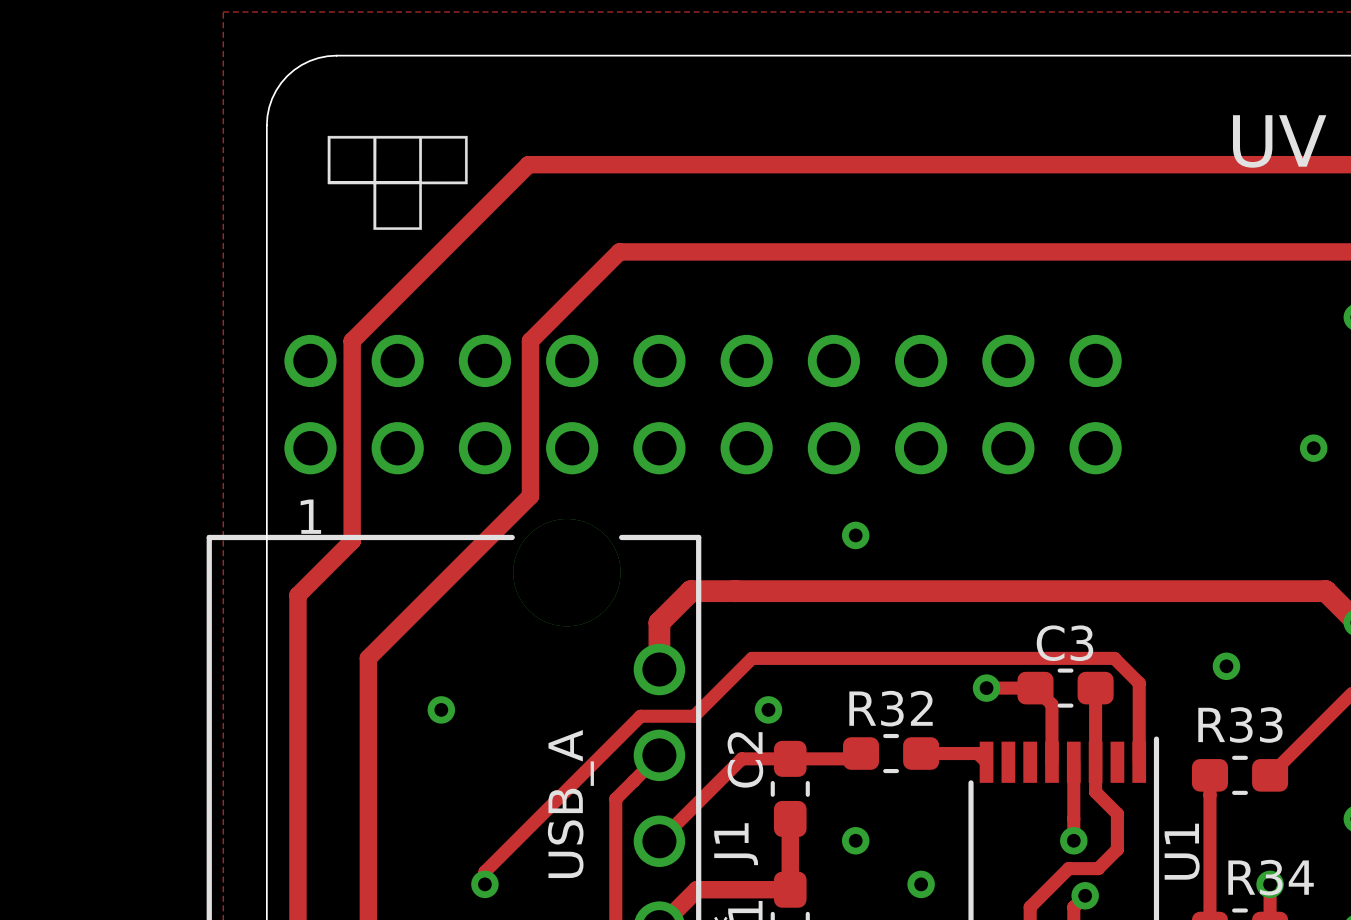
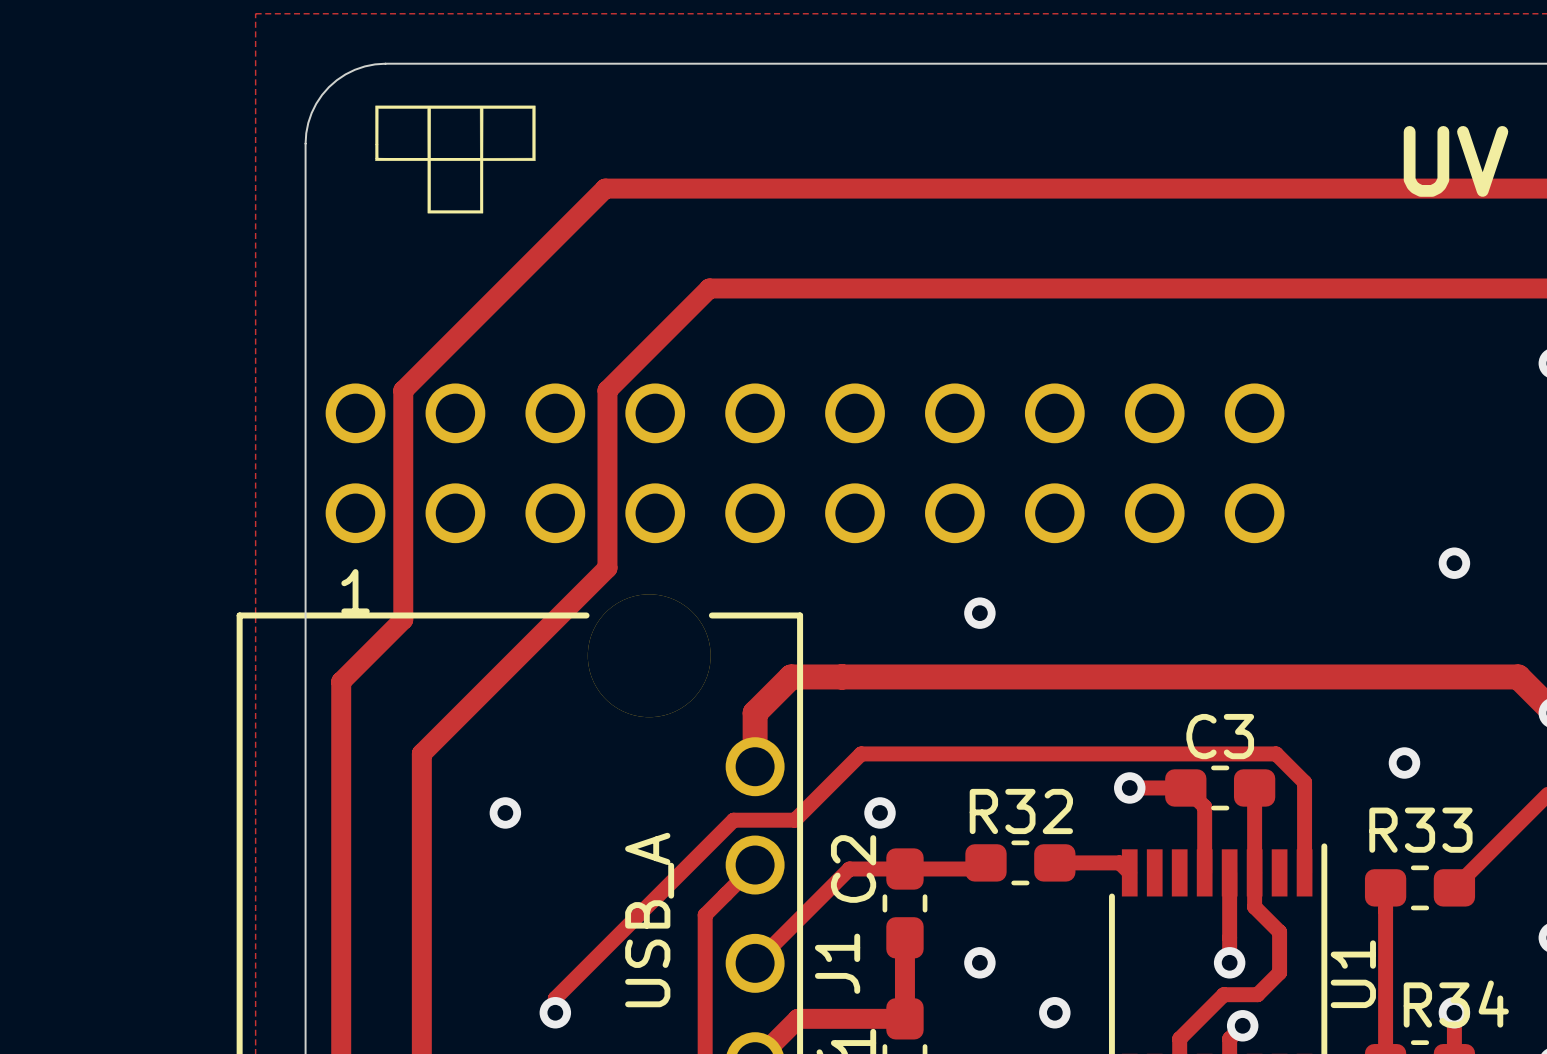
drawing position: (397, 182) -> (455, 159)
via position: (1313, 448) -> (1454, 563)

